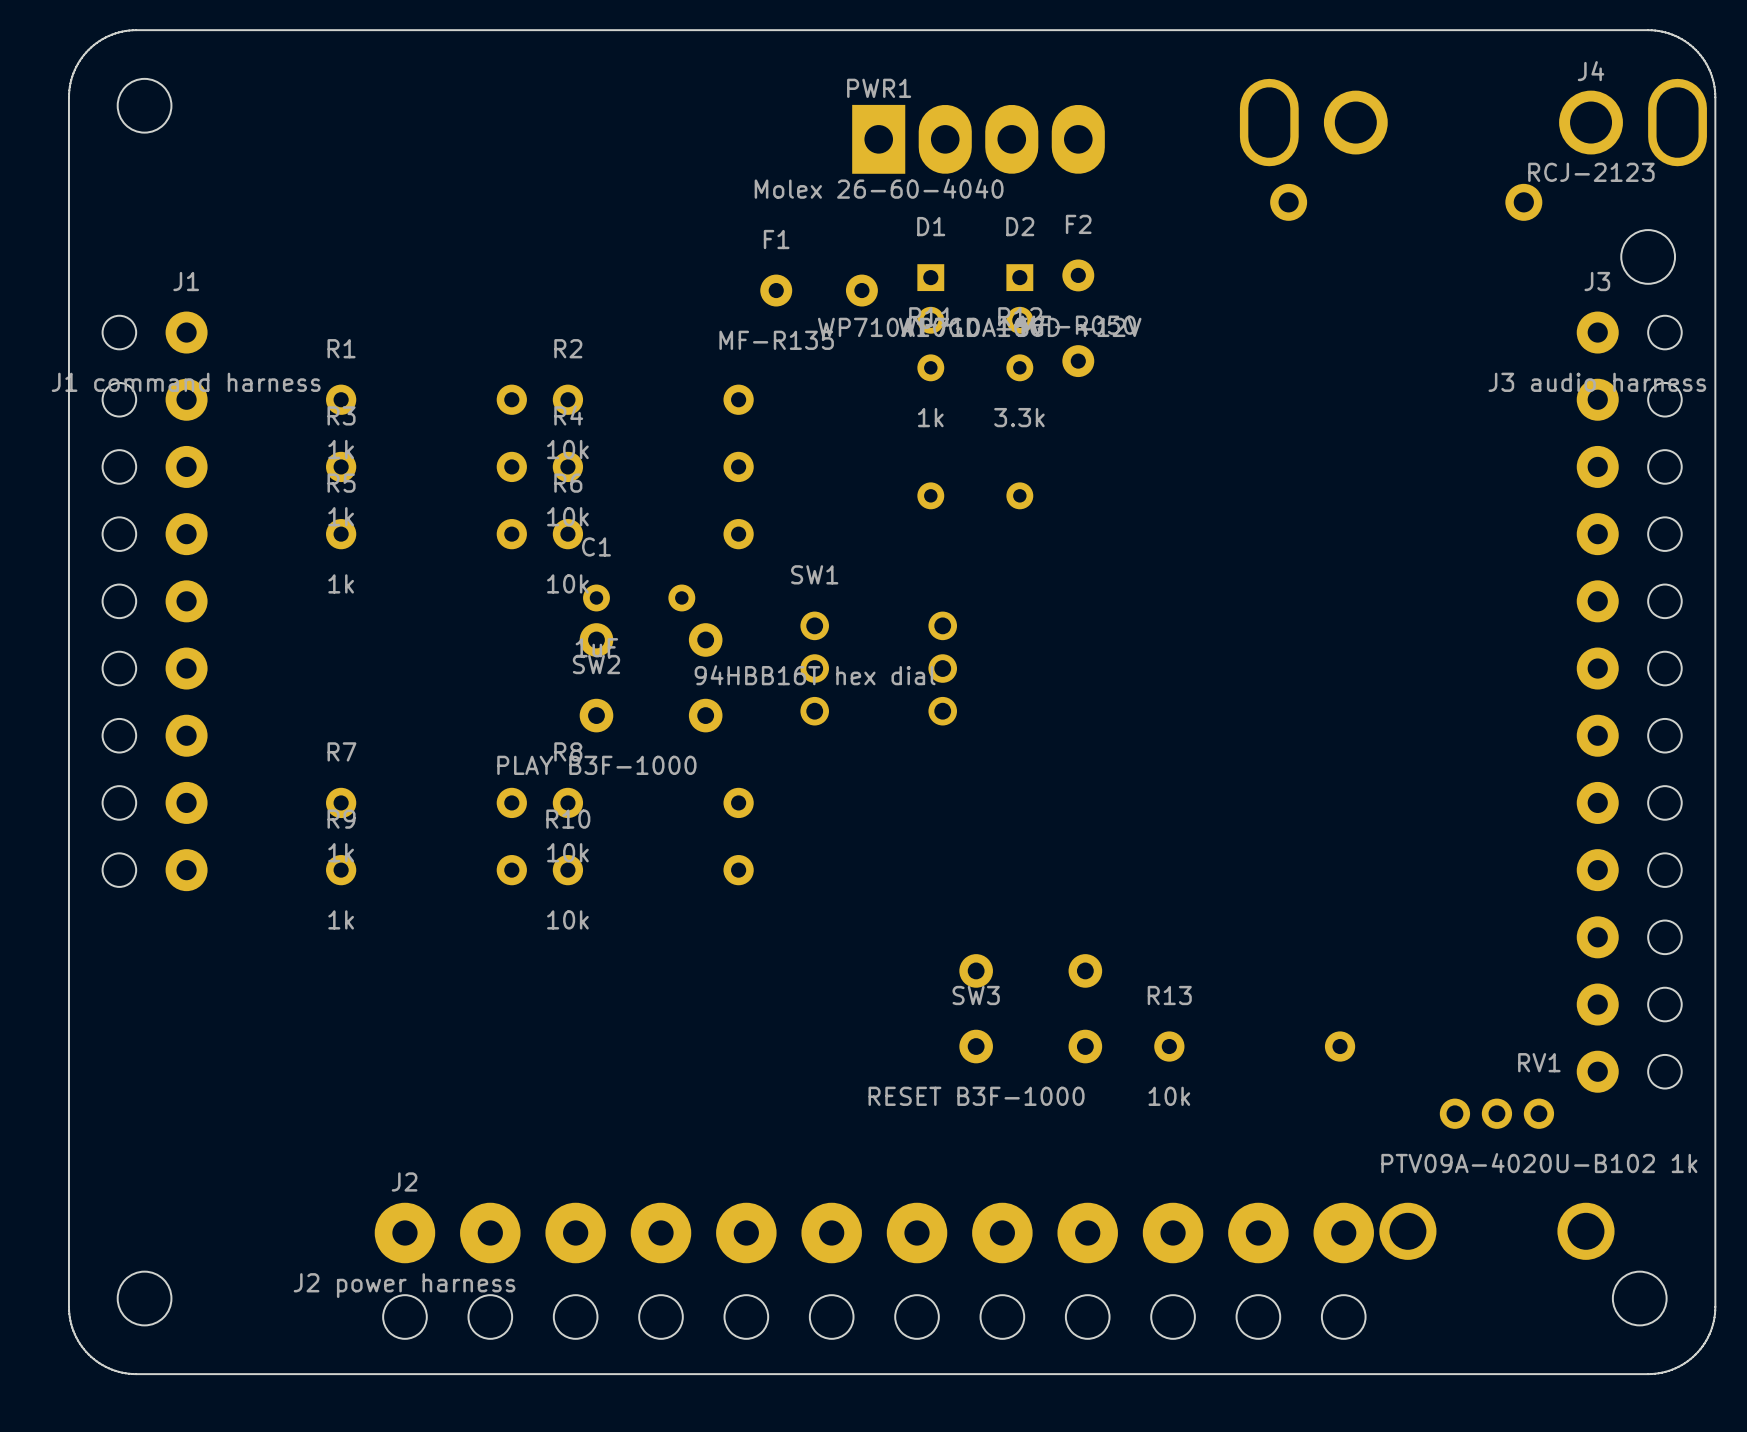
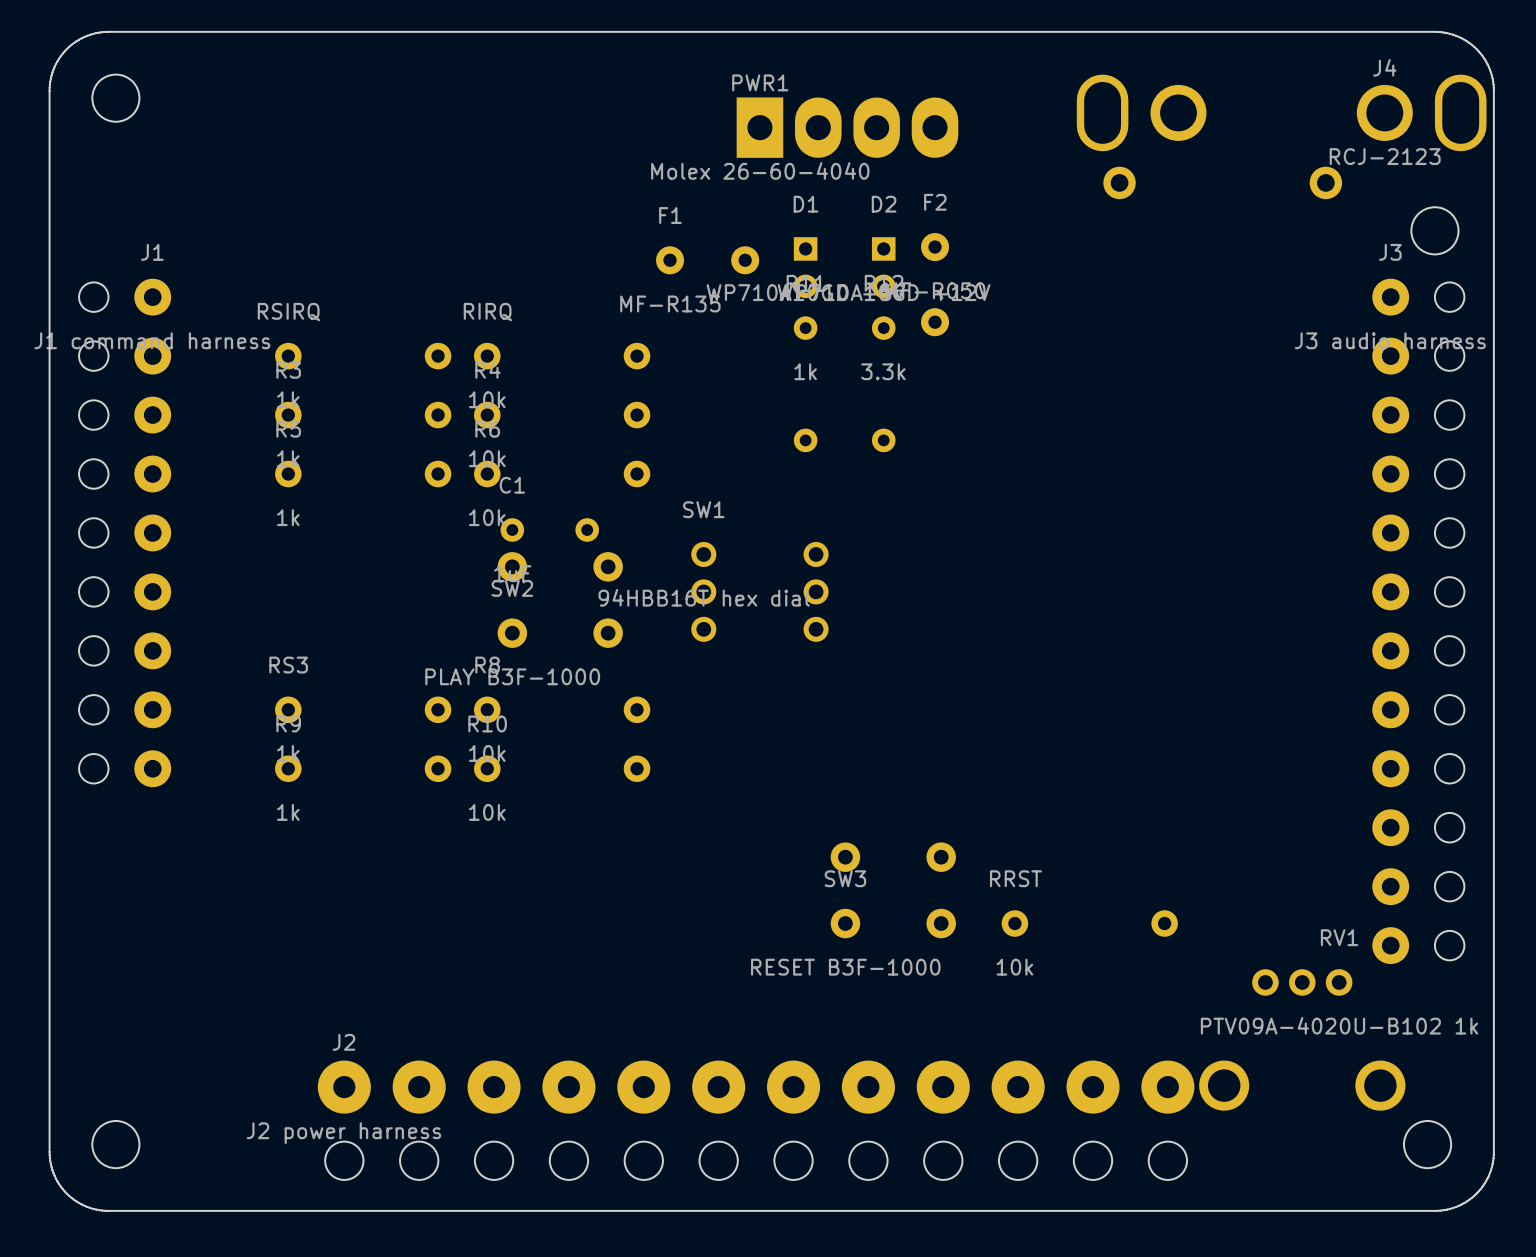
R1 name: R1 (341, 348) -> RSIRQ (289, 312)
R2 name: R2 (568, 348) -> RIRQ (487, 312)
R7 name: R7 (341, 751) -> RS3 (288, 665)
R13 name: R13 (1169, 995) -> RRST (1015, 878)

